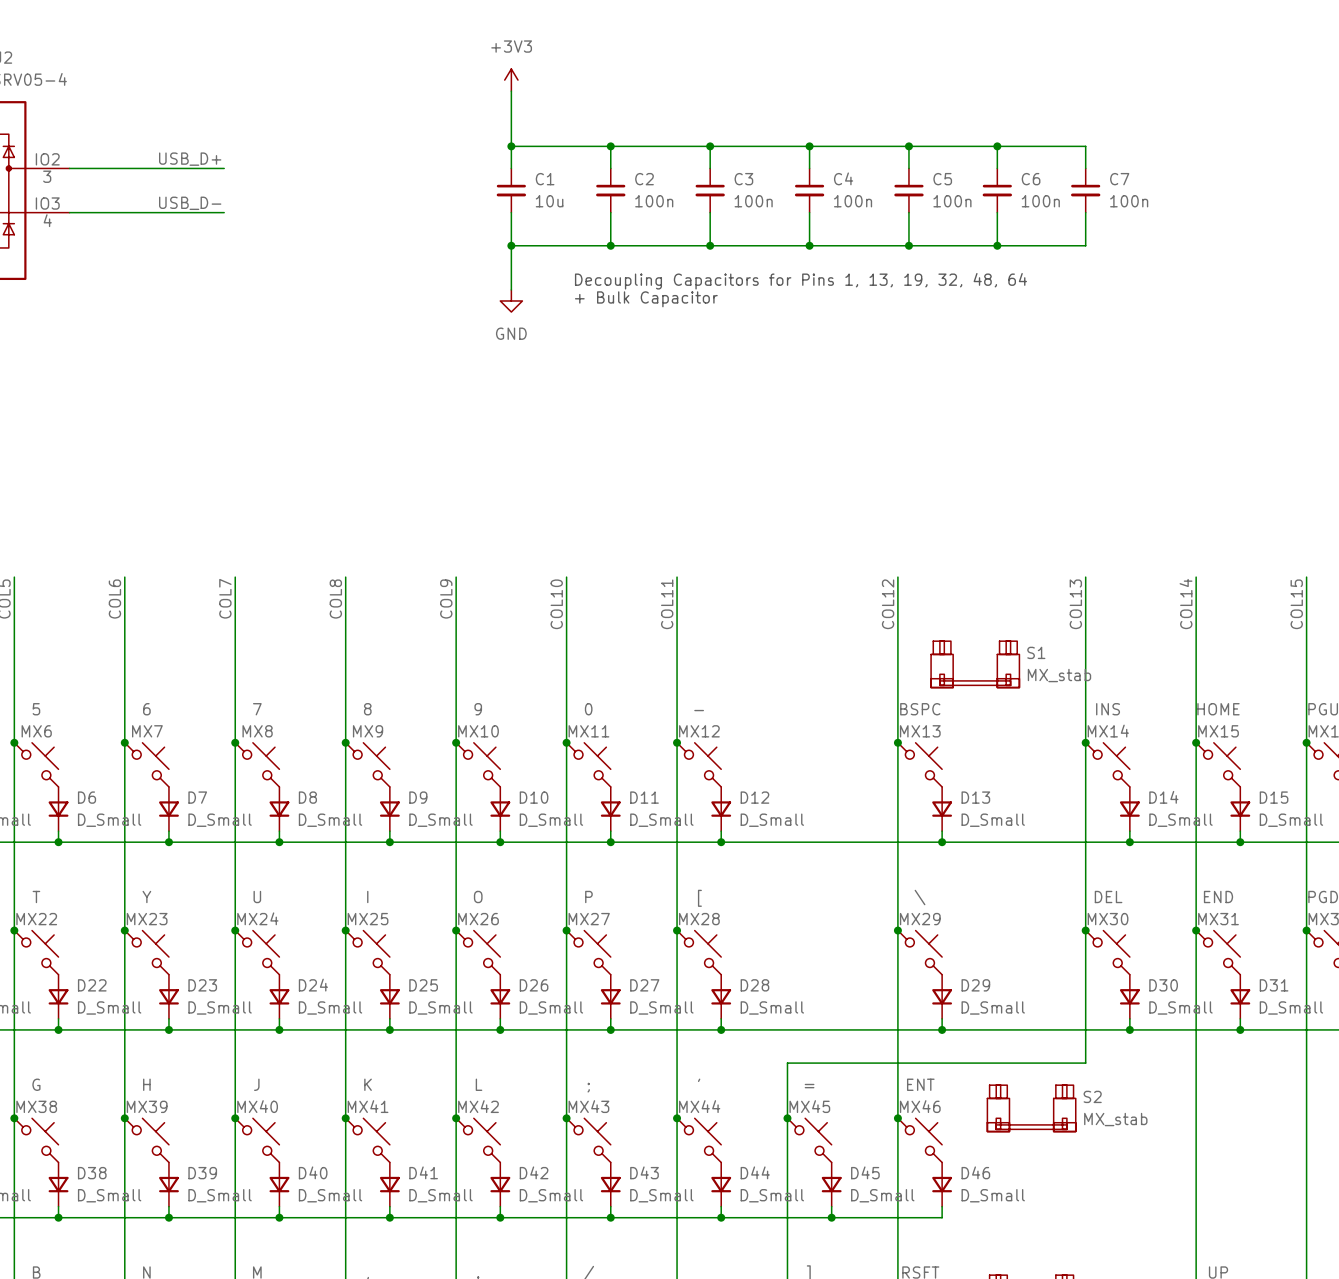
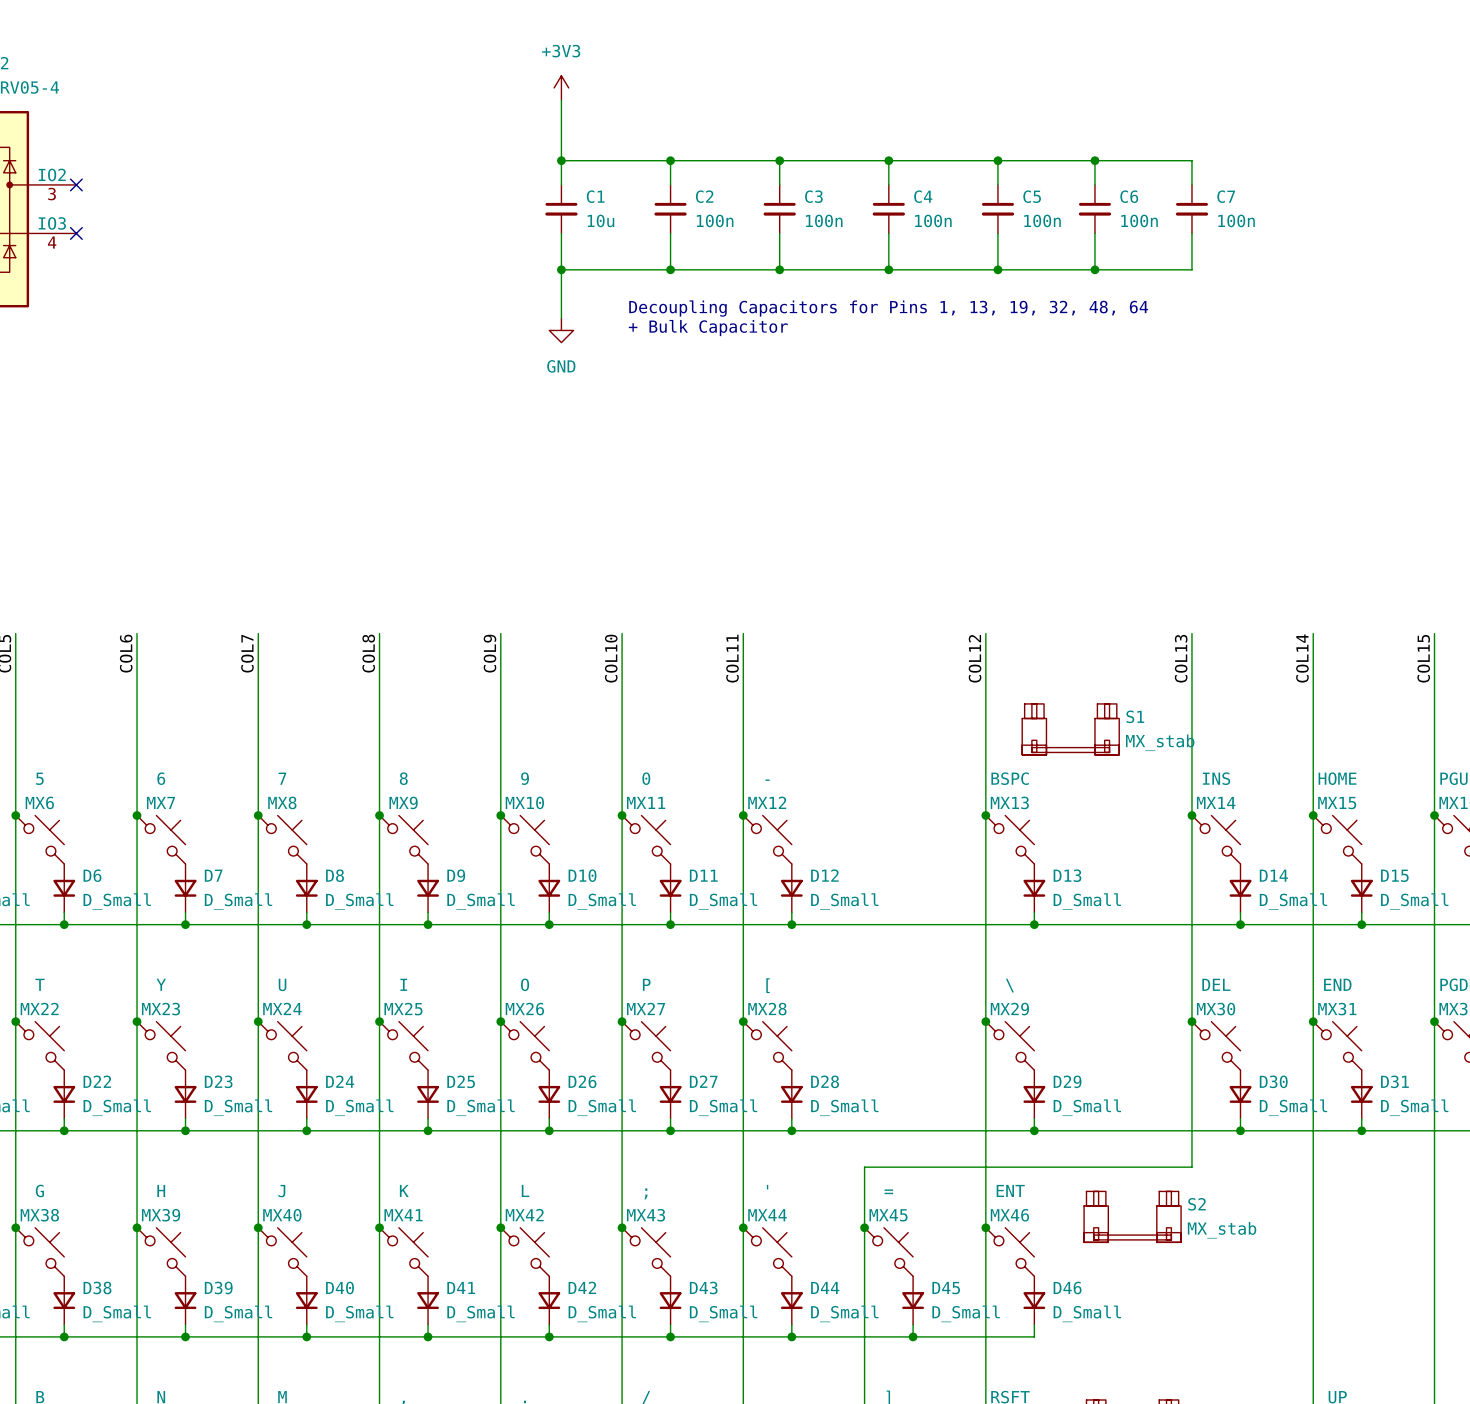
label: USB_D+ (190, 159) -> none
wire: (69, 168) (224, 168) -> none
no-connect mark: none -> (76, 184)
label: USB_D- (190, 203) -> none
wire: (69, 212) (224, 212) -> none
no-connect mark: none -> (76, 233)

